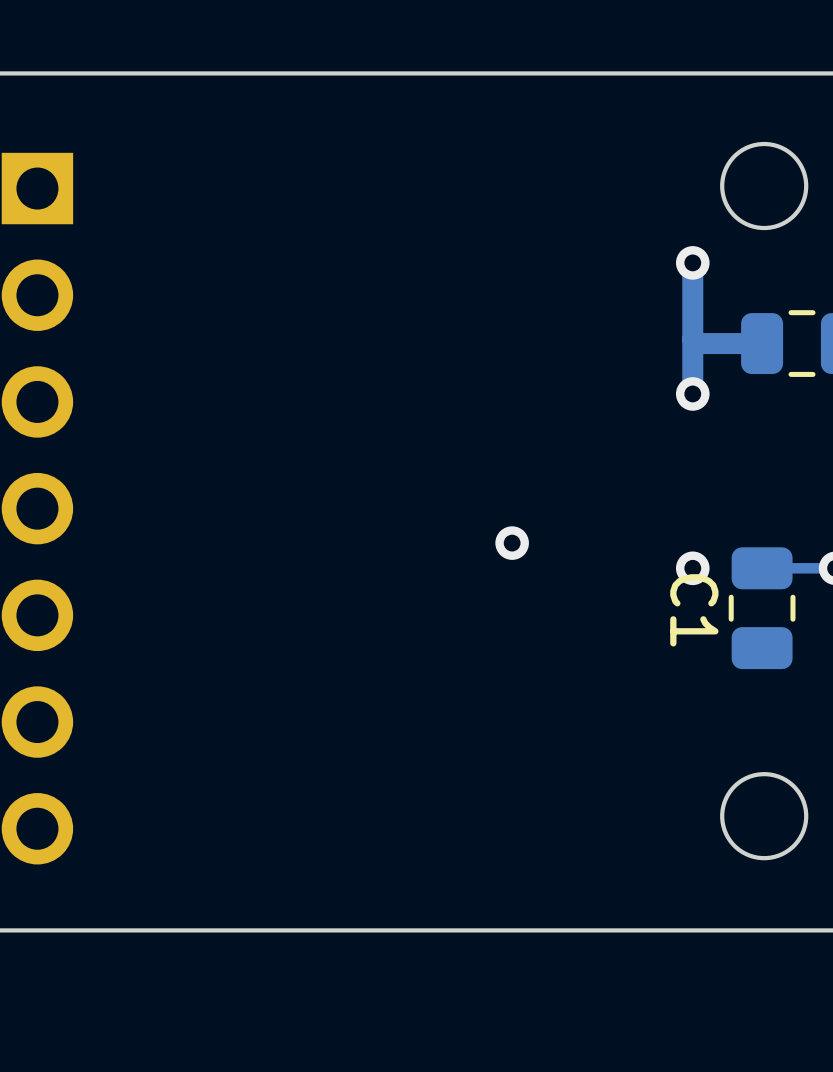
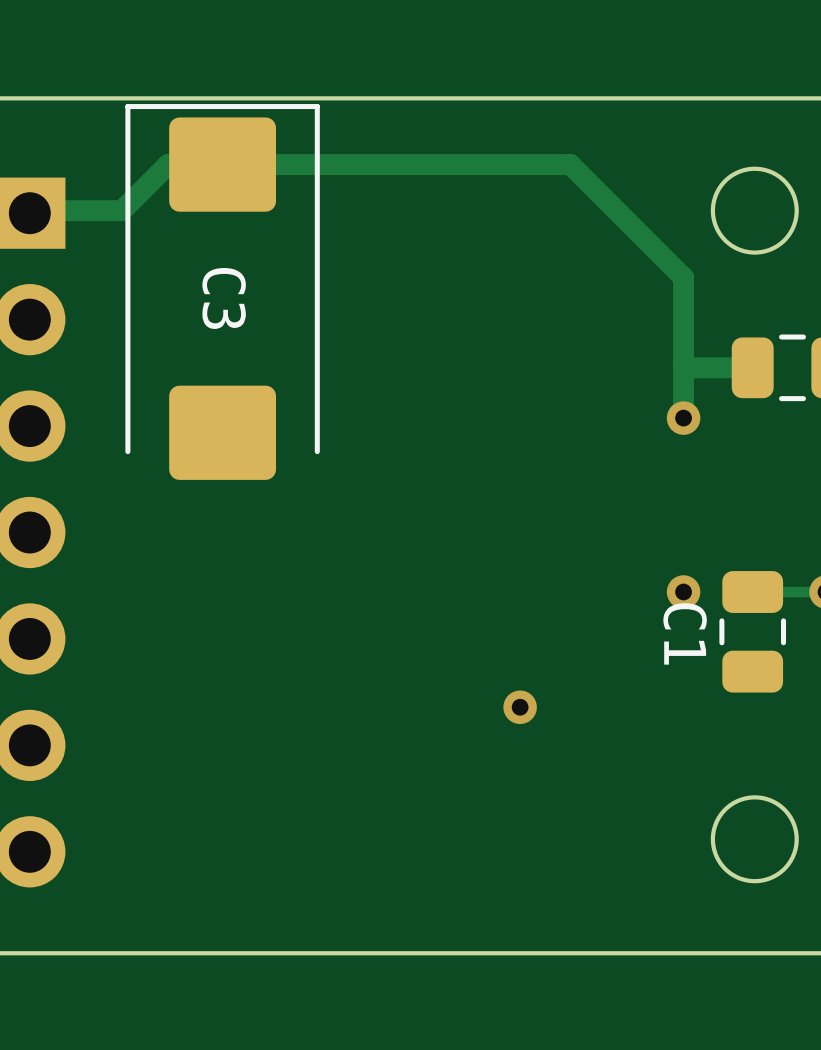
track: none -> (29, 213) (32, 210) (122, 210) (168, 164) (570, 164) (683, 277) (683, 287)
via: (692, 262) -> none
C3: none -> (222, 291)
via position: (512, 543) -> (520, 707)

